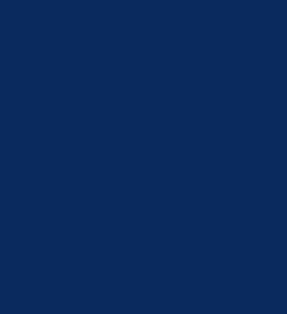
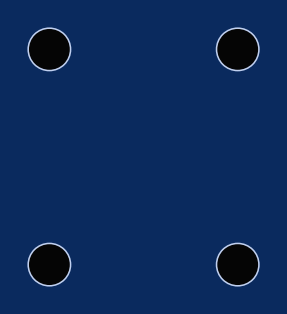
part: none -> (49, 49)
part: none -> (237, 49)
part: none -> (49, 264)
part: none -> (237, 264)

